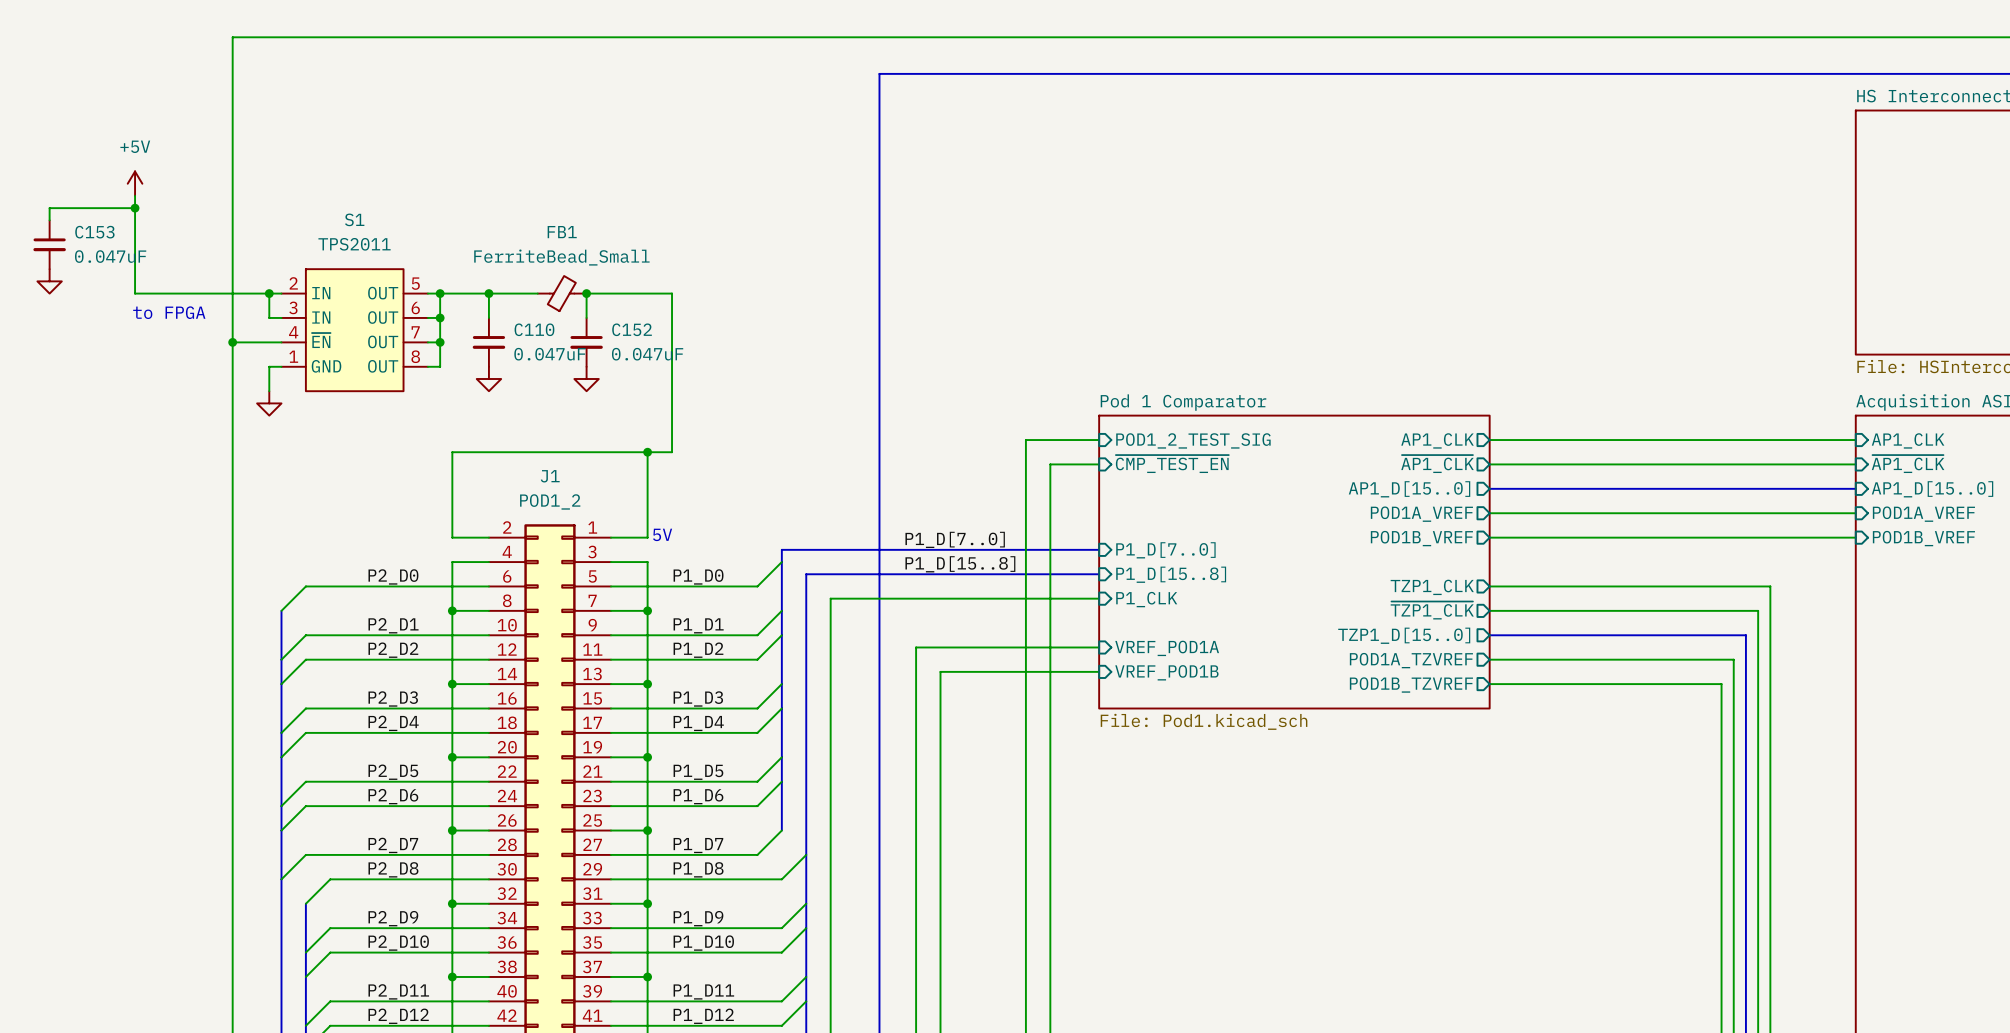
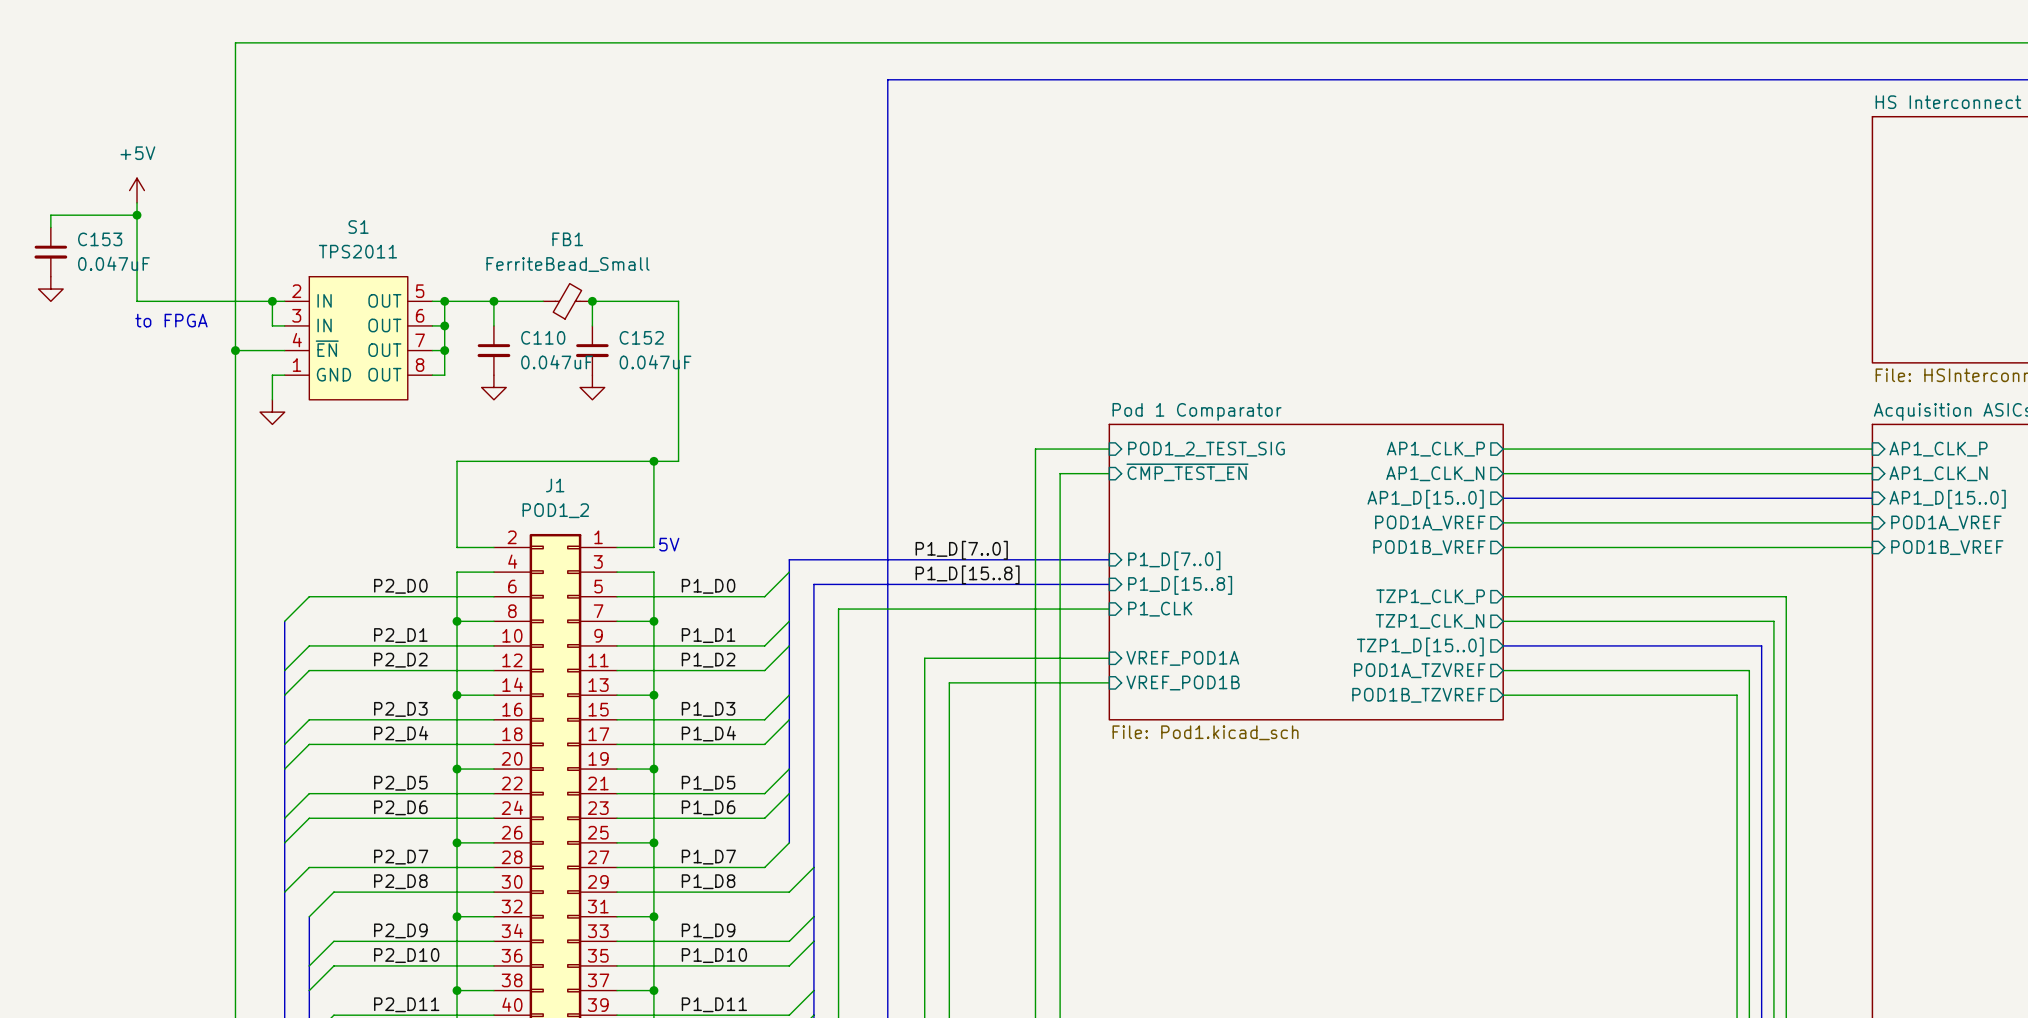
sheet pin: AP1_CLK (1437, 440) -> AP1_CLK_P (1435, 449)
sheet pin: AP1_CLK (1908, 440) -> AP1_CLK_P (1938, 449)
sheet pin: ~{AP1_CLK} (1437, 464) -> AP1_CLK_N (1435, 473)
sheet pin: ~{AP1_CLK} (1908, 464) -> AP1_CLK_N (1938, 473)
sheet pin: TZP1_CLK (1432, 587) -> TZP1_CLK_P (1430, 596)
sheet pin: ~{TZP1_CLK} (1432, 610) -> TZP1_CLK_N (1430, 621)

